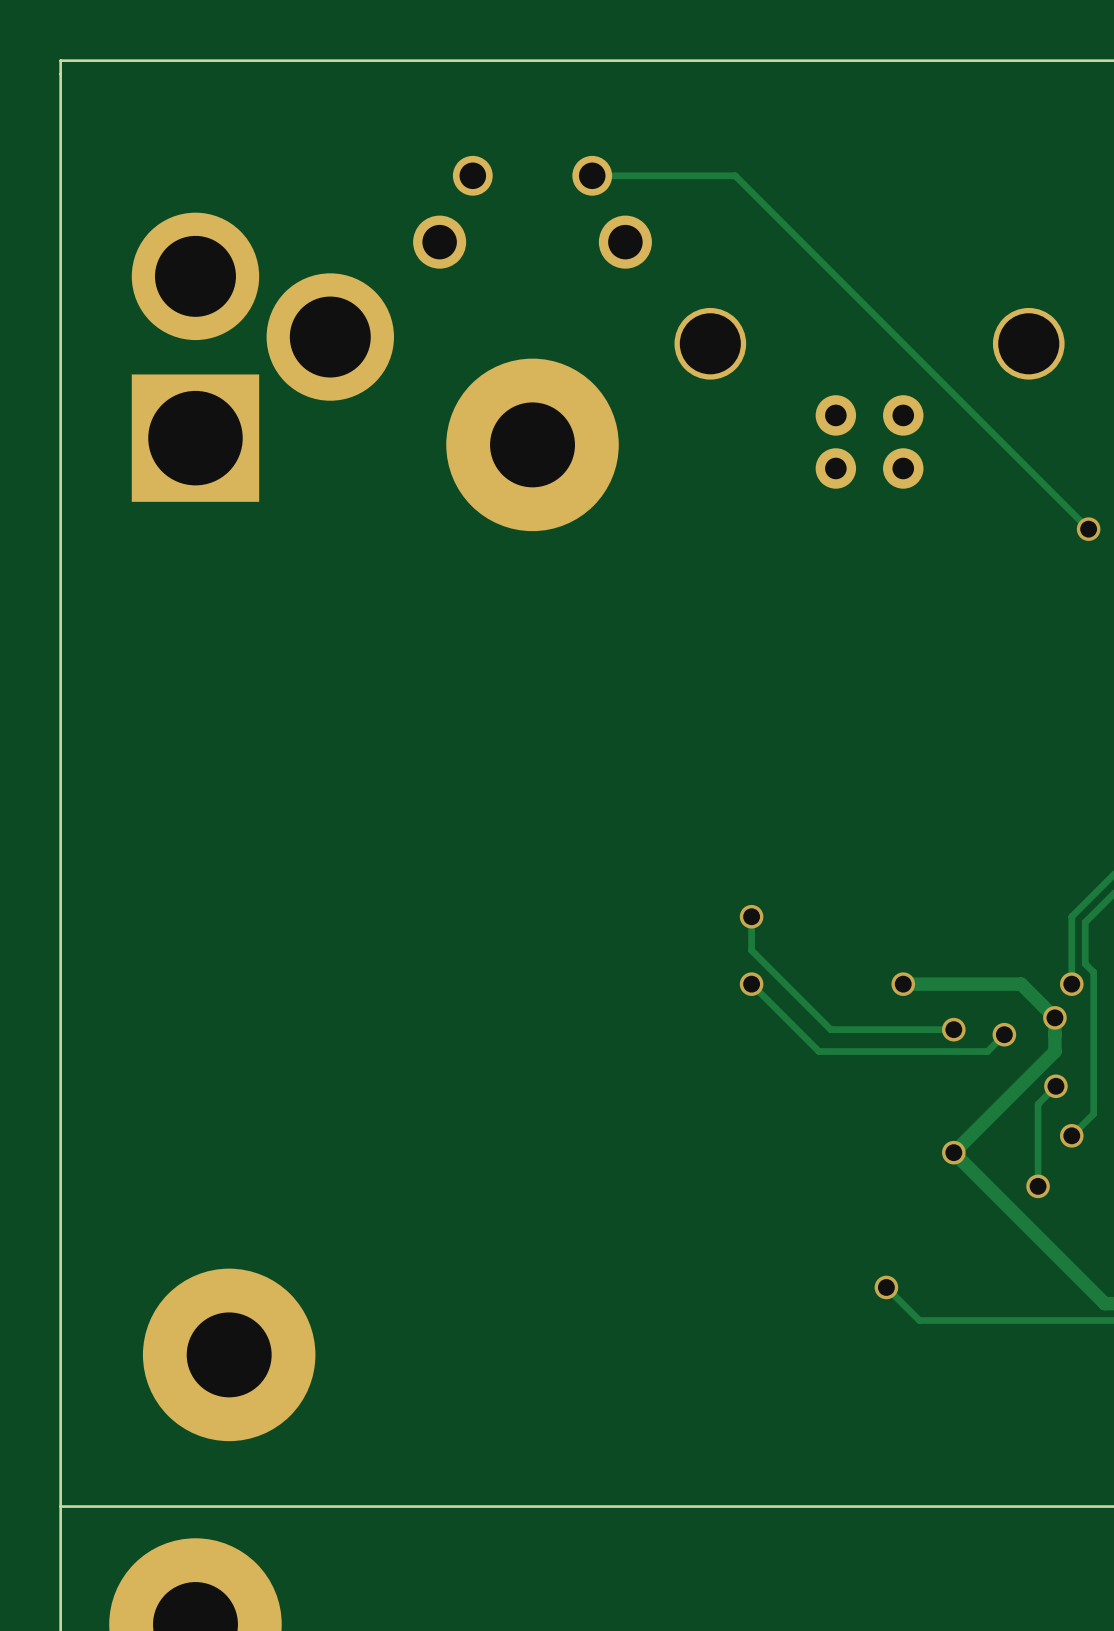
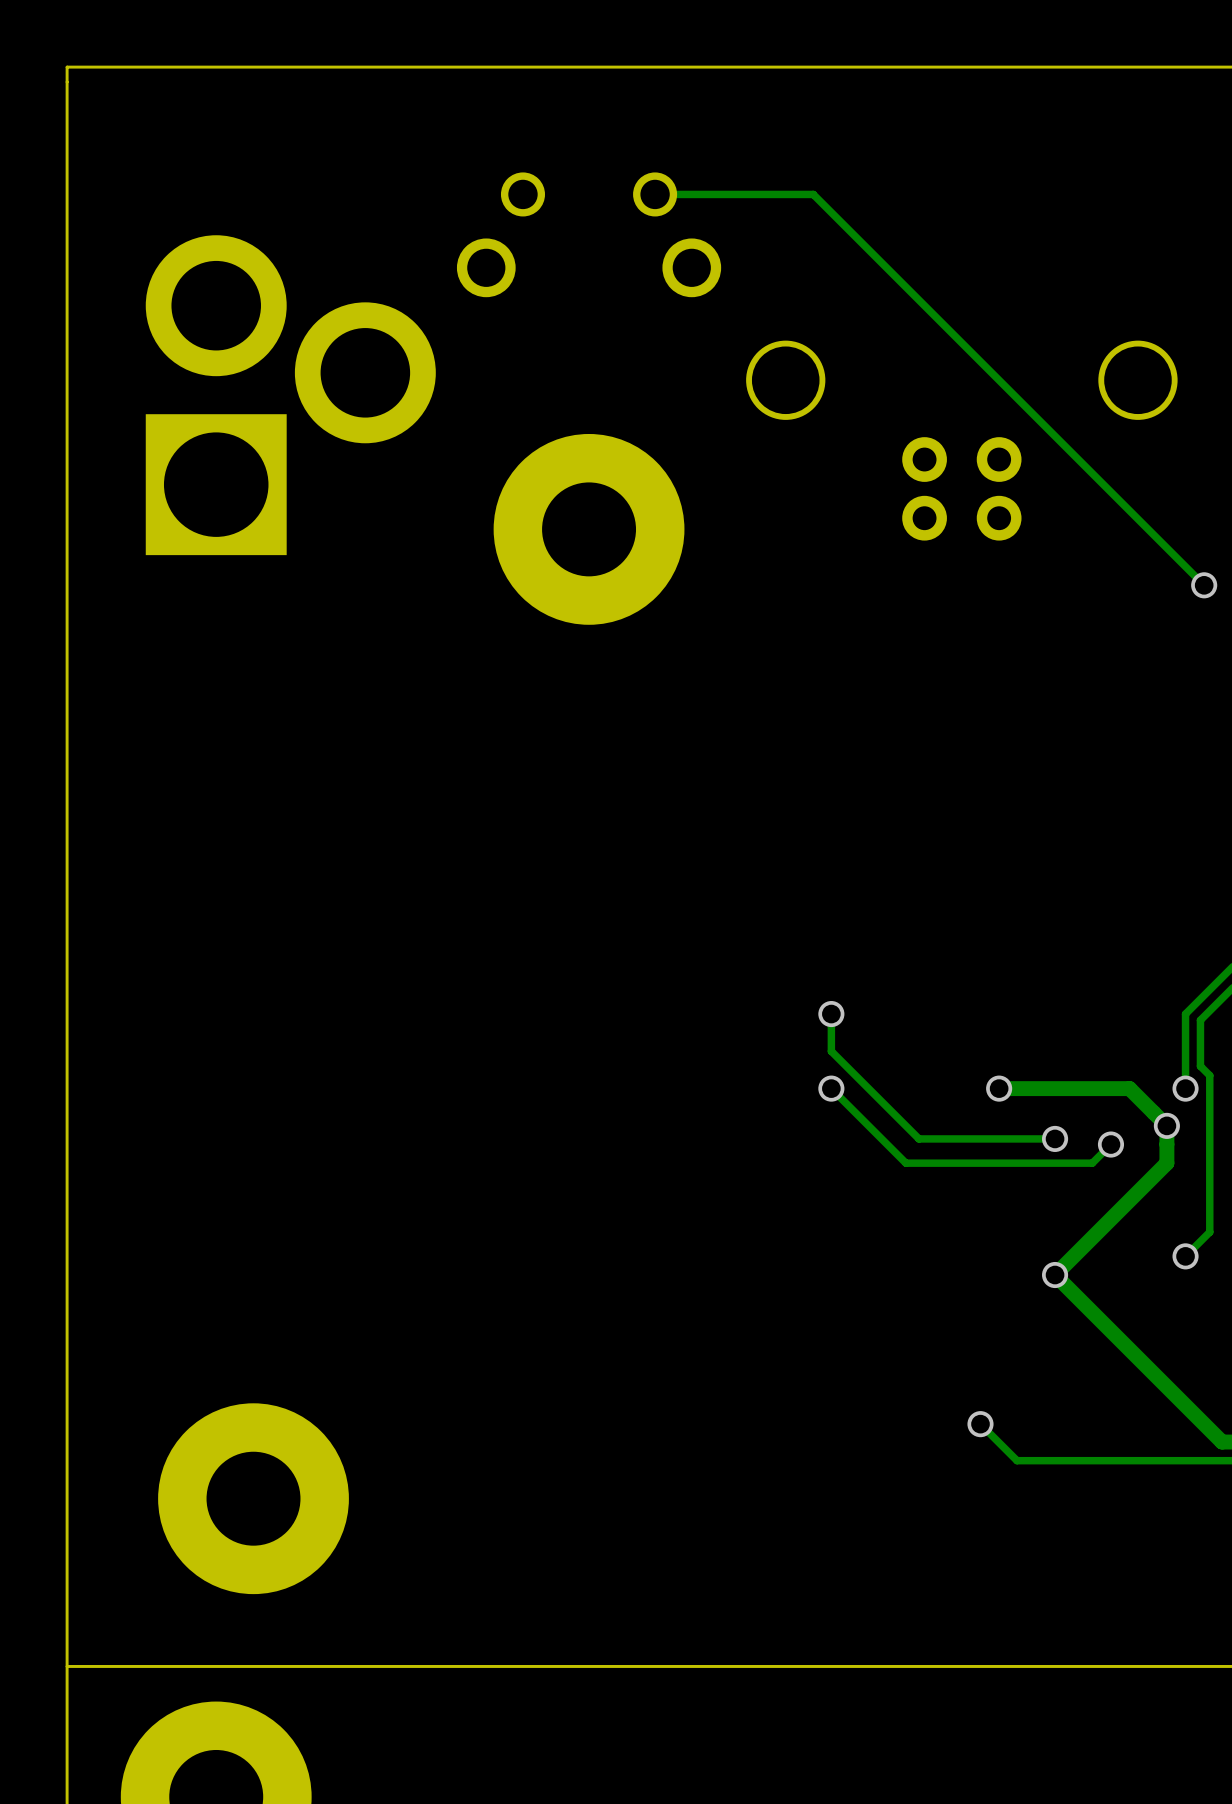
part position: (532, 444) -> (589, 529)
track: (1055, 1086) (1038, 1104) (1038, 1186) -> none
via: (1055, 1086) -> none
via: (1038, 1186) -> none

